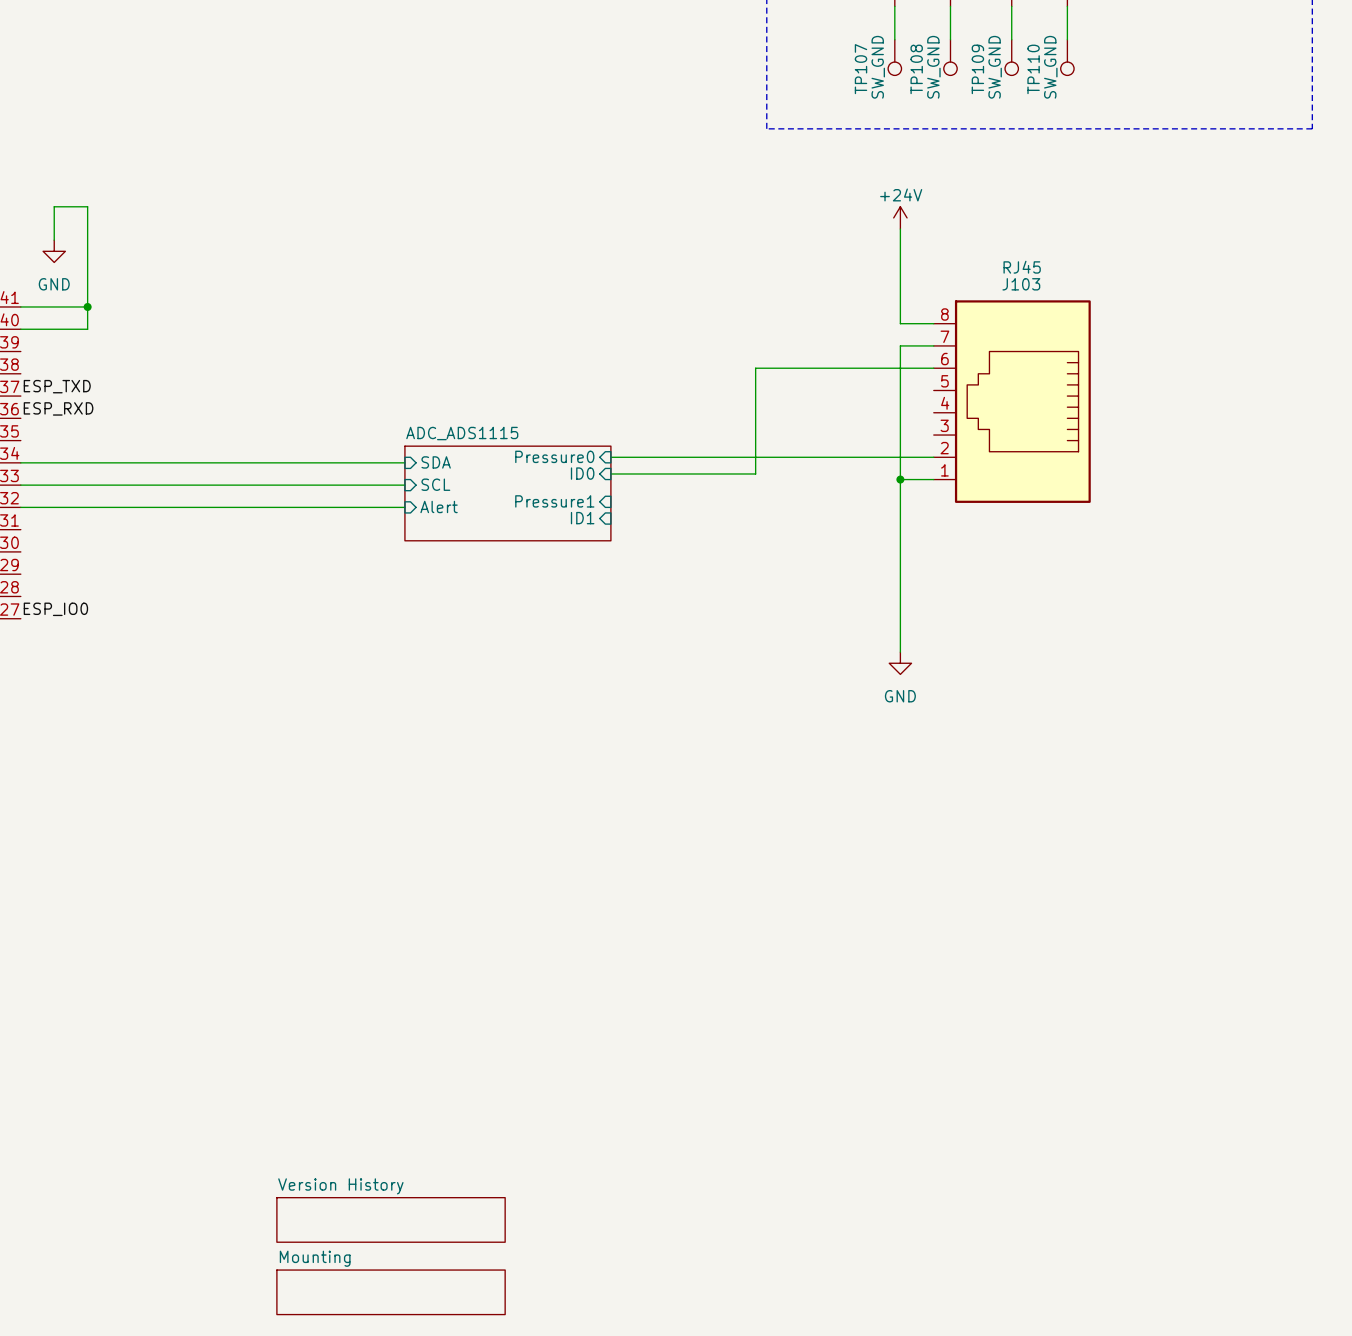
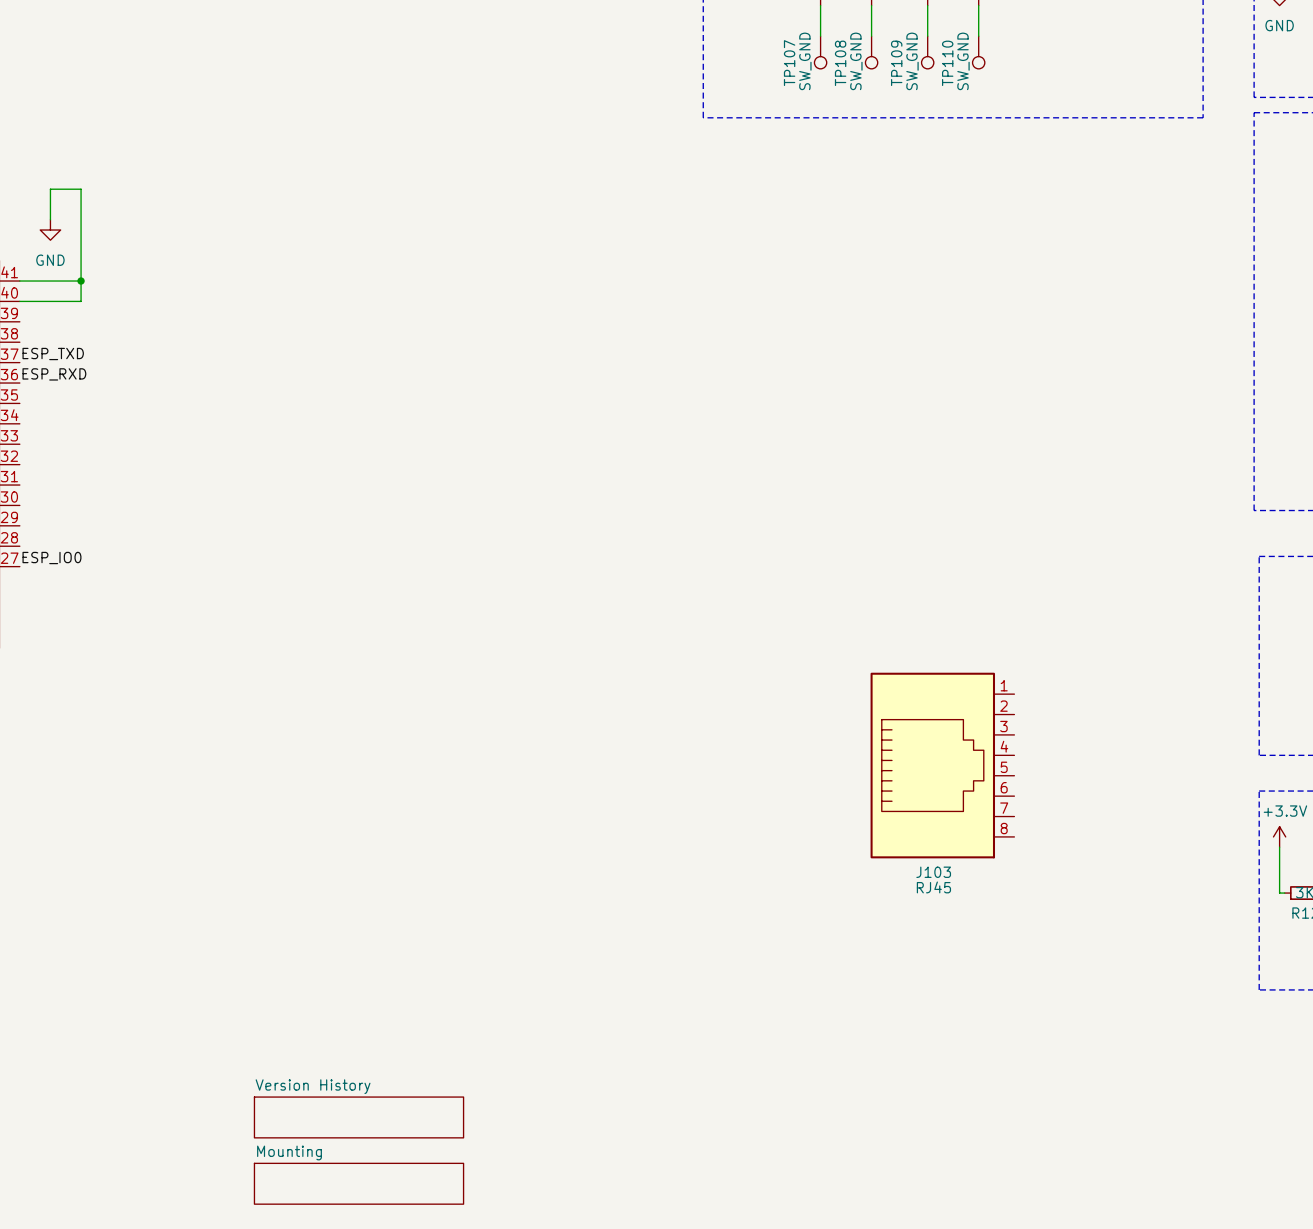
power symbol: +24V (900, 217) -> none
wire: (900, 229) (900, 323) (933, 323) -> none
wire: (933, 345) (900, 345) (900, 652) -> none
wire: (933, 368) (755, 368) (755, 473) (610, 473) -> none
J103 position: (1012, 401) -> (942, 765)
J103 rotation: 0° (1022, 401) -> 180° (932, 765)
sheet pin: Pressure0 (554, 456) -> none
wire: (610, 457) (933, 457) -> none
wire: (20, 462) (404, 462) -> none
sheet pin: SDA (436, 462) -> none
sheet pin: ID0 (582, 473) -> none
wire: (900, 479) (933, 479) -> none
junction: (900, 479) -> none
sheet pin: SCL (435, 484) -> none
wire: (20, 485) (404, 485) -> none
sheet ADC_ADS1115: (507, 493) -> none
sheet pin: Pressure1 (554, 501) -> none
sheet pin: Alert (439, 506) -> none
wire: (20, 507) (404, 507) -> none
sheet pin: ID1 (582, 518) -> none
power symbol: GND (900, 663) -> none

